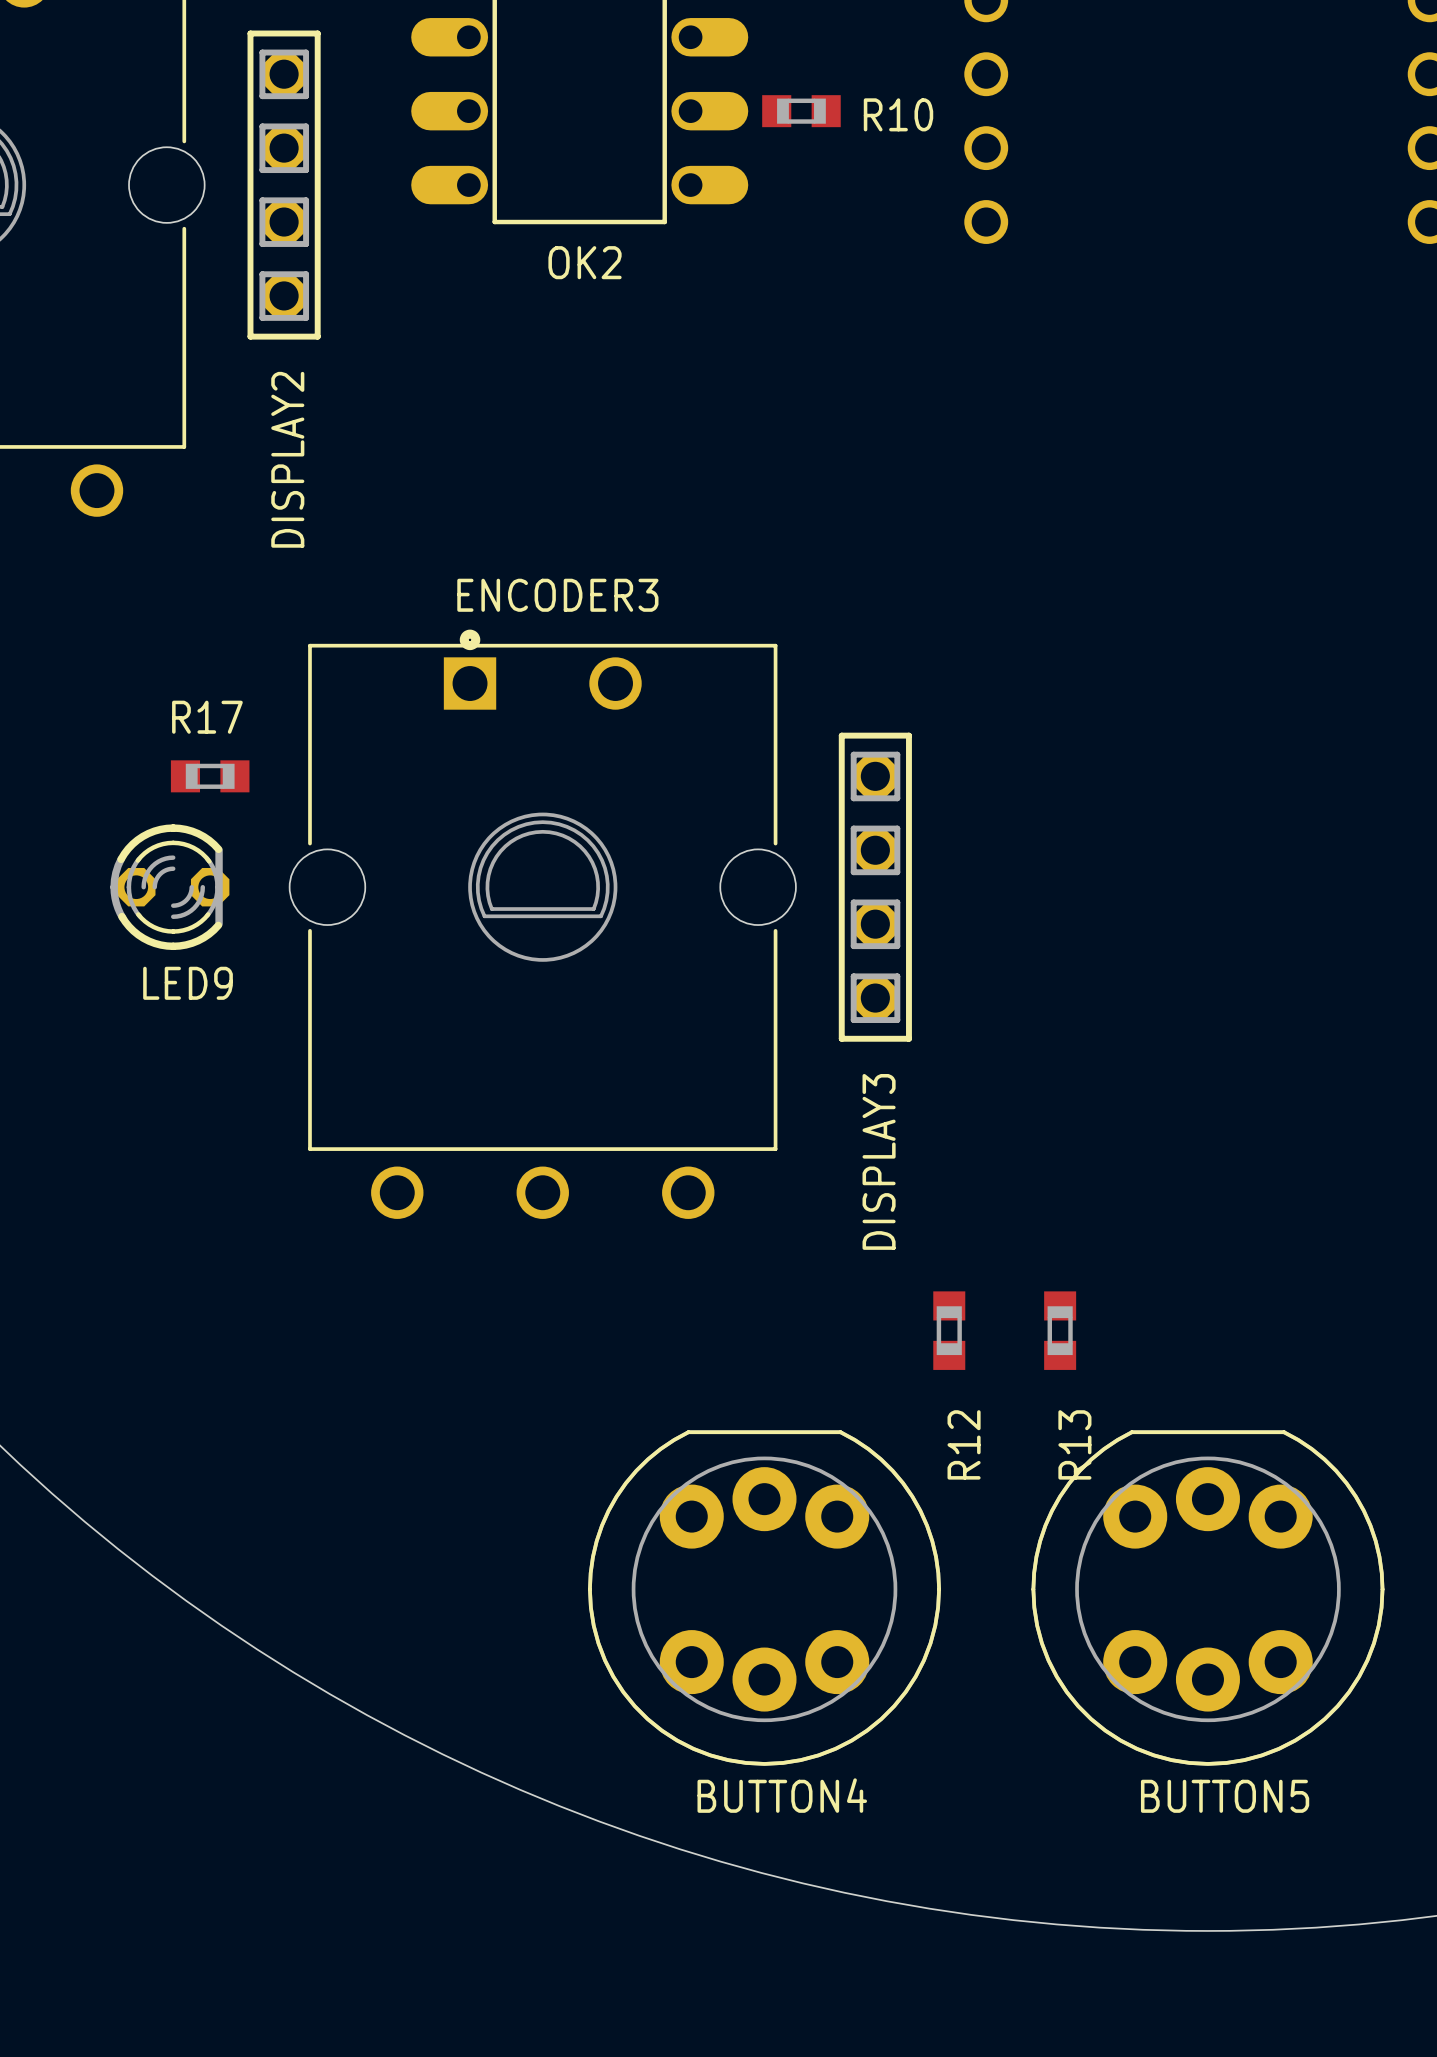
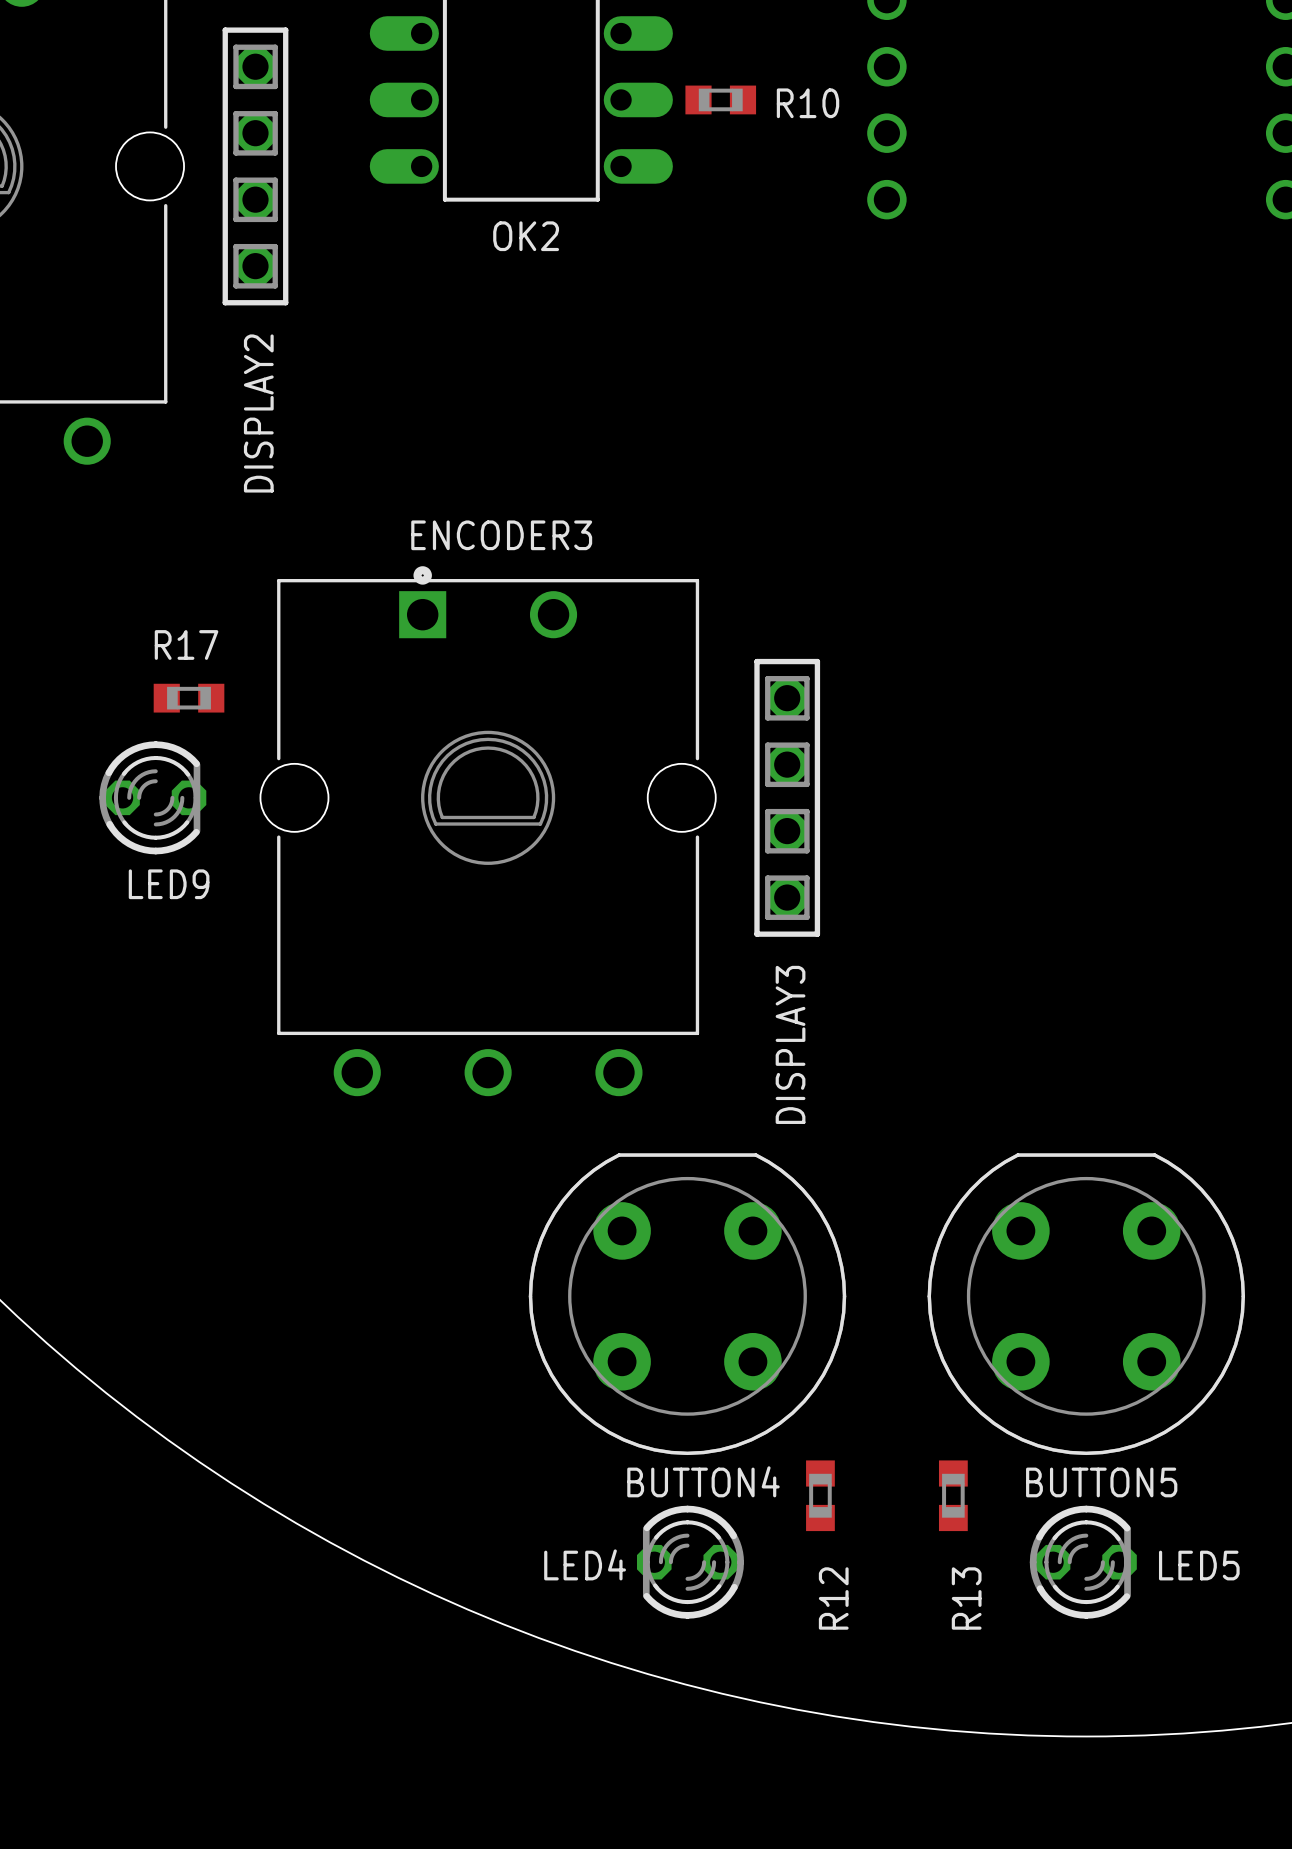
R12 position: (949, 1330) -> (820, 1495)
R13 position: (1060, 1330) -> (953, 1495)
BUTTON4 footprint: [588, 1430, 941, 1766] -> [528, 1153, 847, 1456]
BUTTON5 footprint: [1031, 1430, 1385, 1766] -> [927, 1153, 1245, 1456]
LED4: none -> (690, 1562)
LED5: none -> (1083, 1562)

